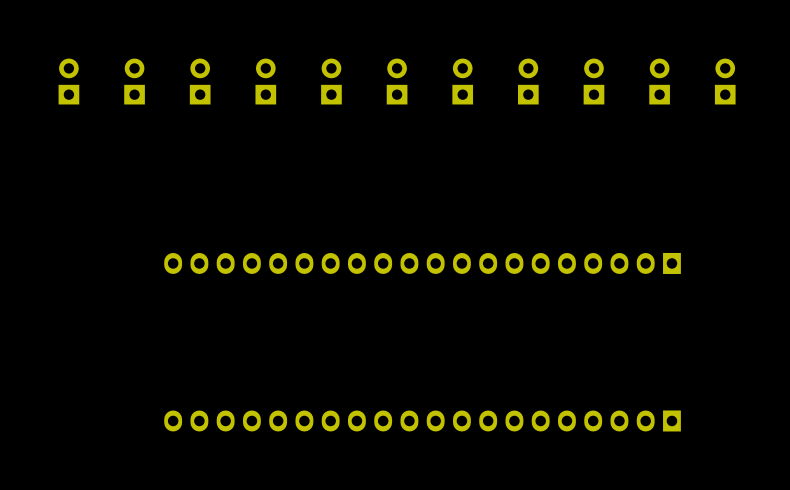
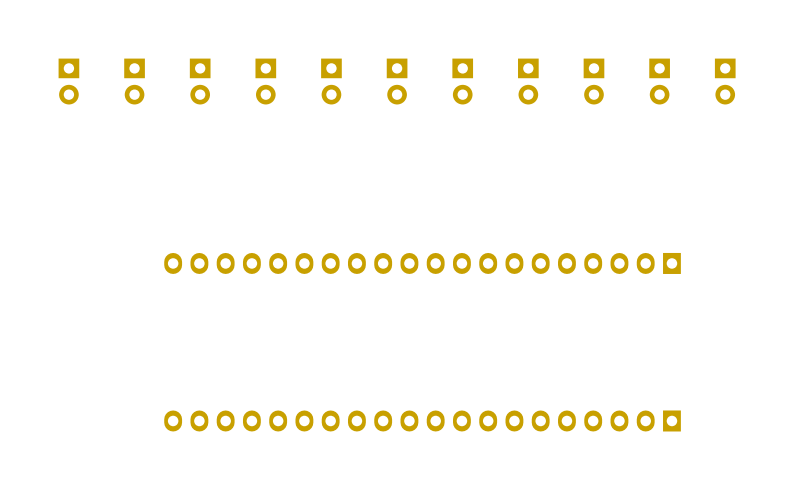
part rotation: 0° (68, 81) -> 180° (68, 81)
part rotation: 0° (134, 81) -> 180° (134, 81)
part rotation: 0° (200, 81) -> 180° (200, 81)
part rotation: 0° (265, 81) -> 180° (265, 81)
part rotation: 0° (331, 81) -> 180° (331, 81)
part rotation: 0° (397, 81) -> 180° (397, 81)
part rotation: 0° (462, 81) -> 180° (462, 81)
part rotation: 0° (528, 81) -> 180° (528, 81)
part rotation: 0° (593, 81) -> 180° (593, 81)
part rotation: 0° (659, 81) -> 180° (659, 81)
part rotation: 0° (725, 81) -> 180° (725, 81)

